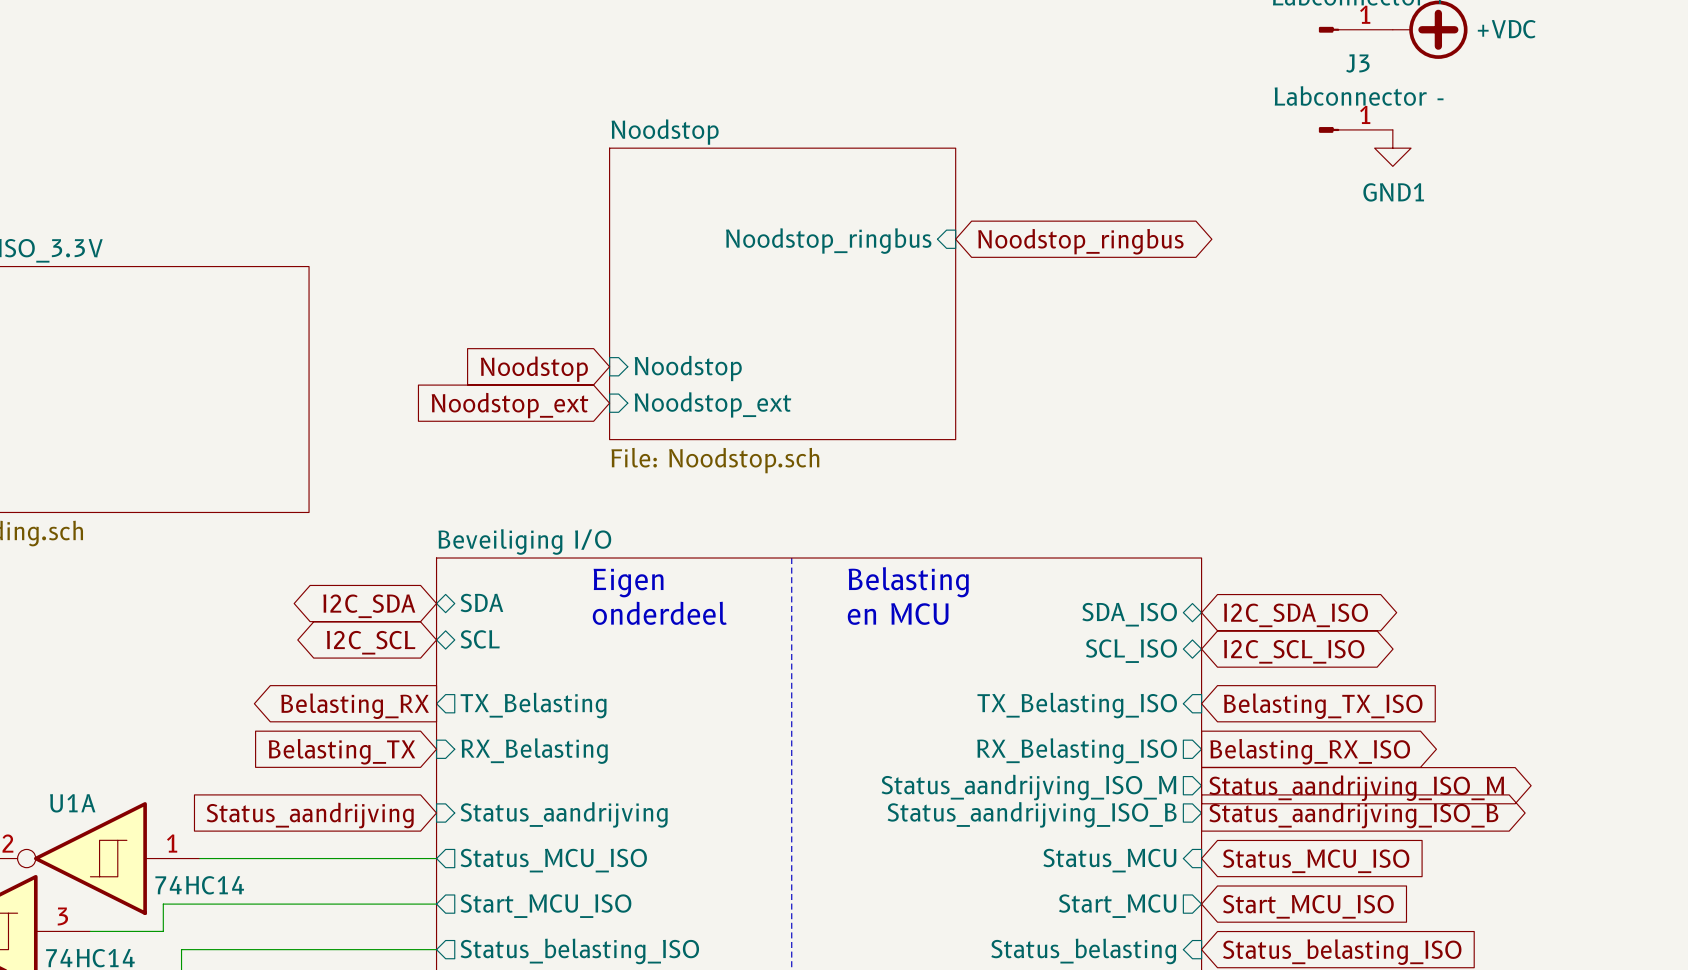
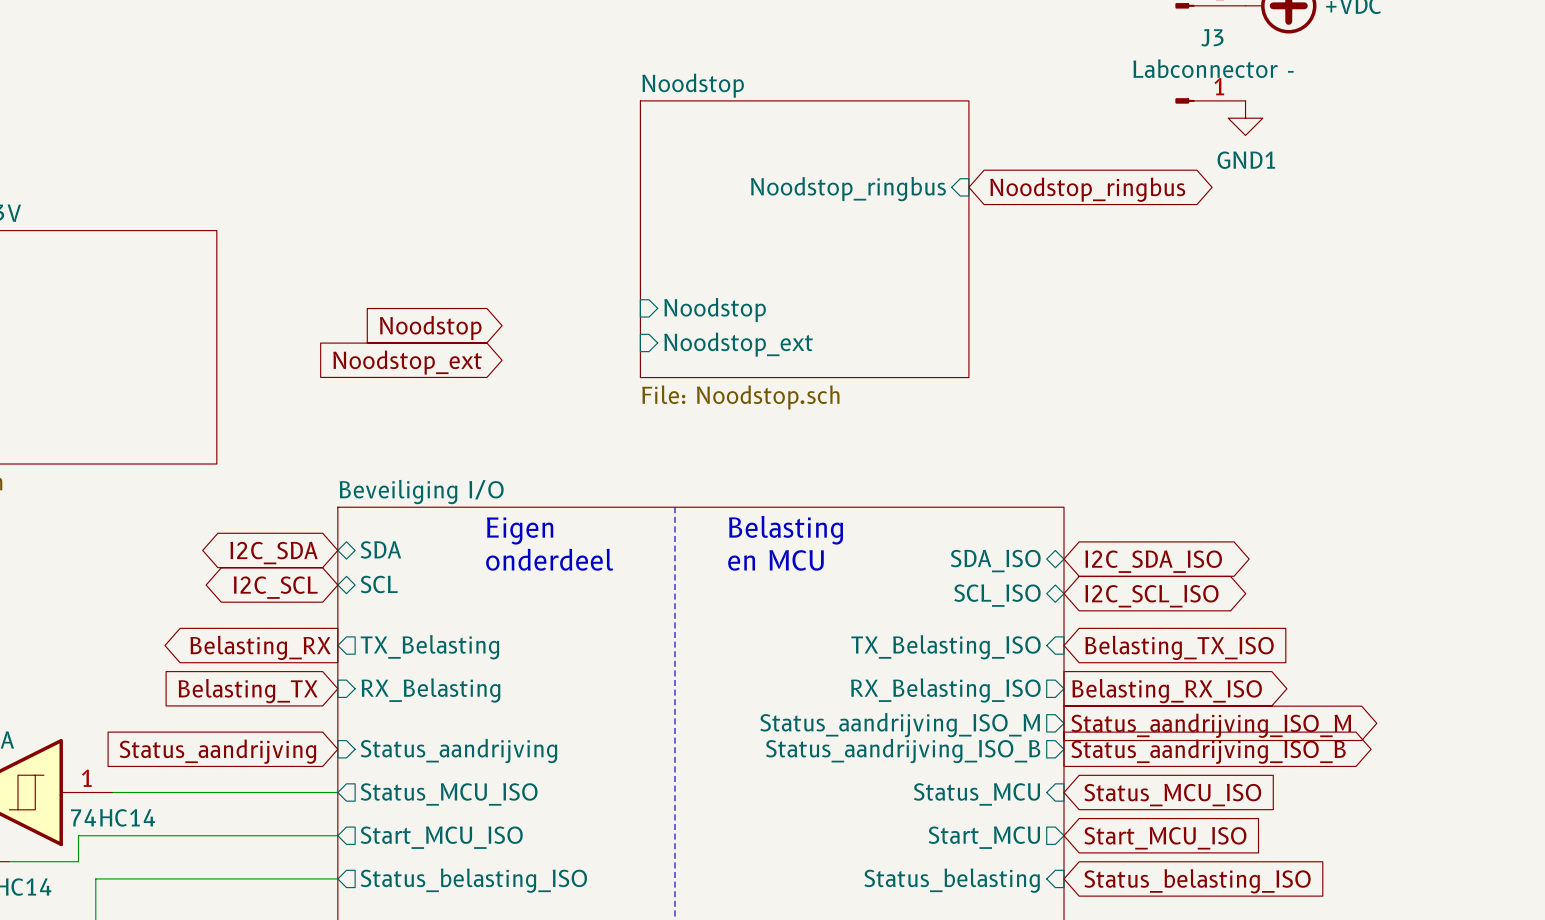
sheet pin position: Noodstop_ringbus (828, 241) -> Noodstop_ringbus (848, 189)
global label position: Noodstop_ringbus (1080, 241) -> Noodstop_ringbus (1087, 189)
sheet Noodstop position: (782, 293) -> (804, 239)
sheet pin position: Noodstop (688, 368) -> Noodstop (715, 310)
sheet pin position: Noodstop_ext (712, 404) -> Noodstop_ext (738, 344)

